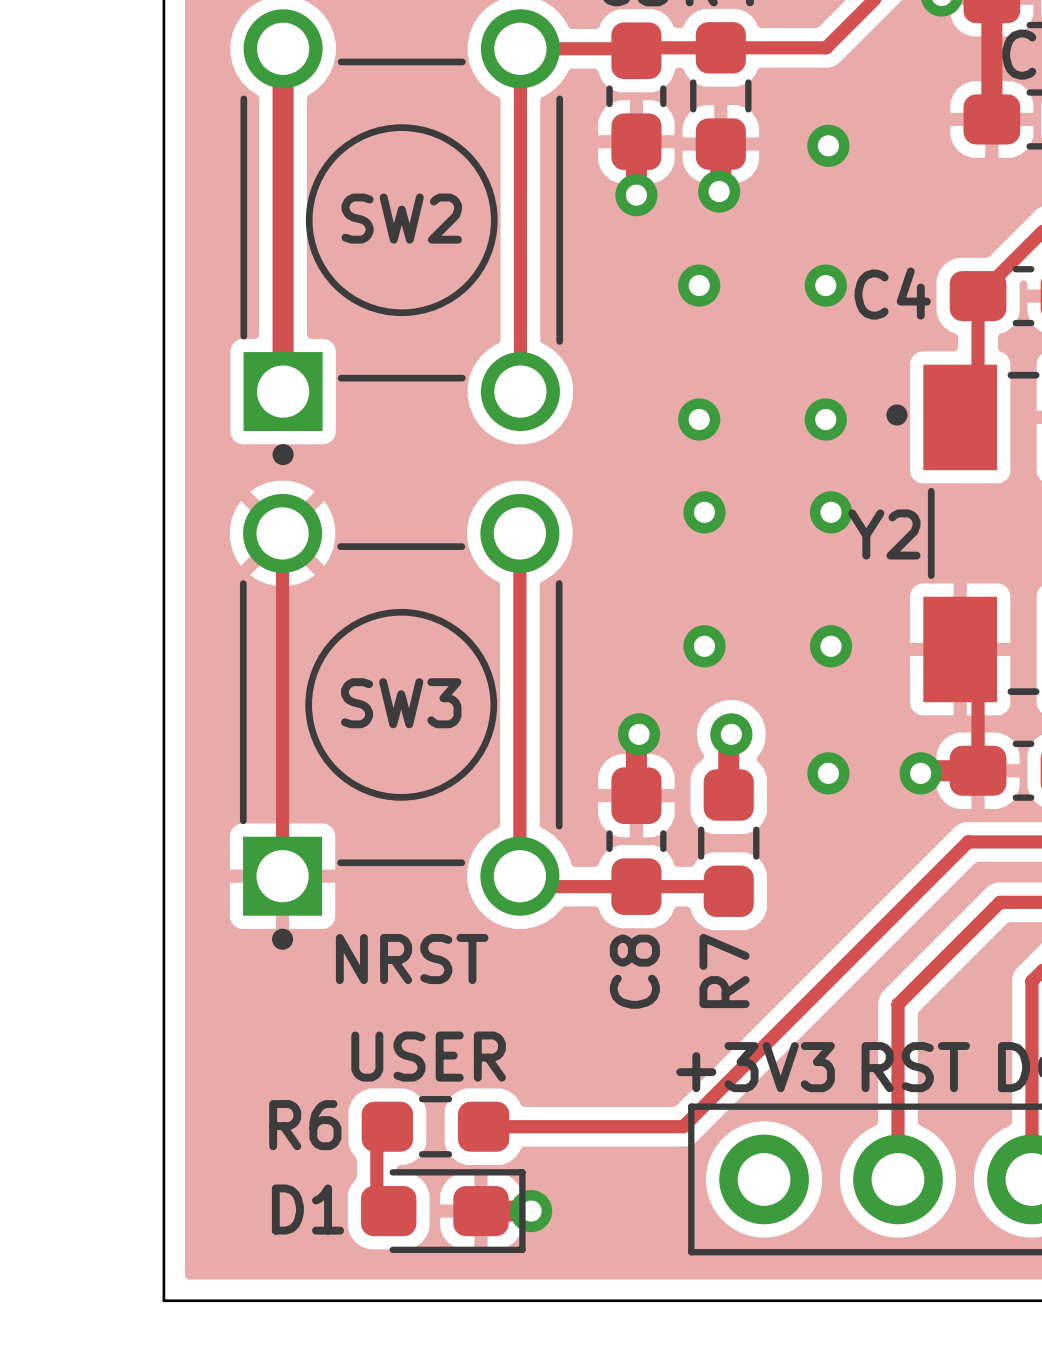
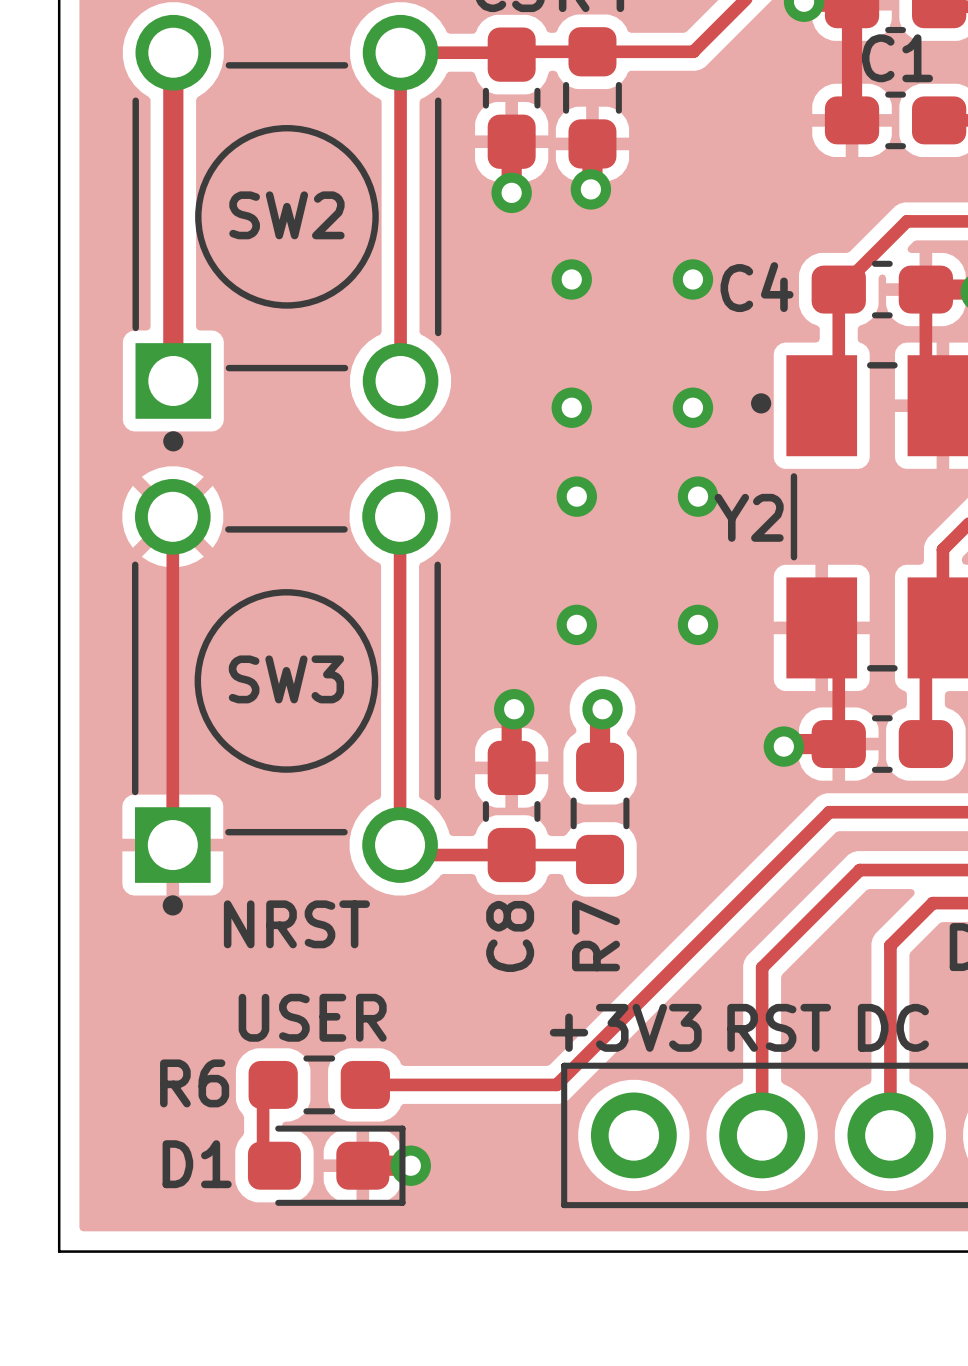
via: (828, 145) -> none
via: (828, 773) -> none

